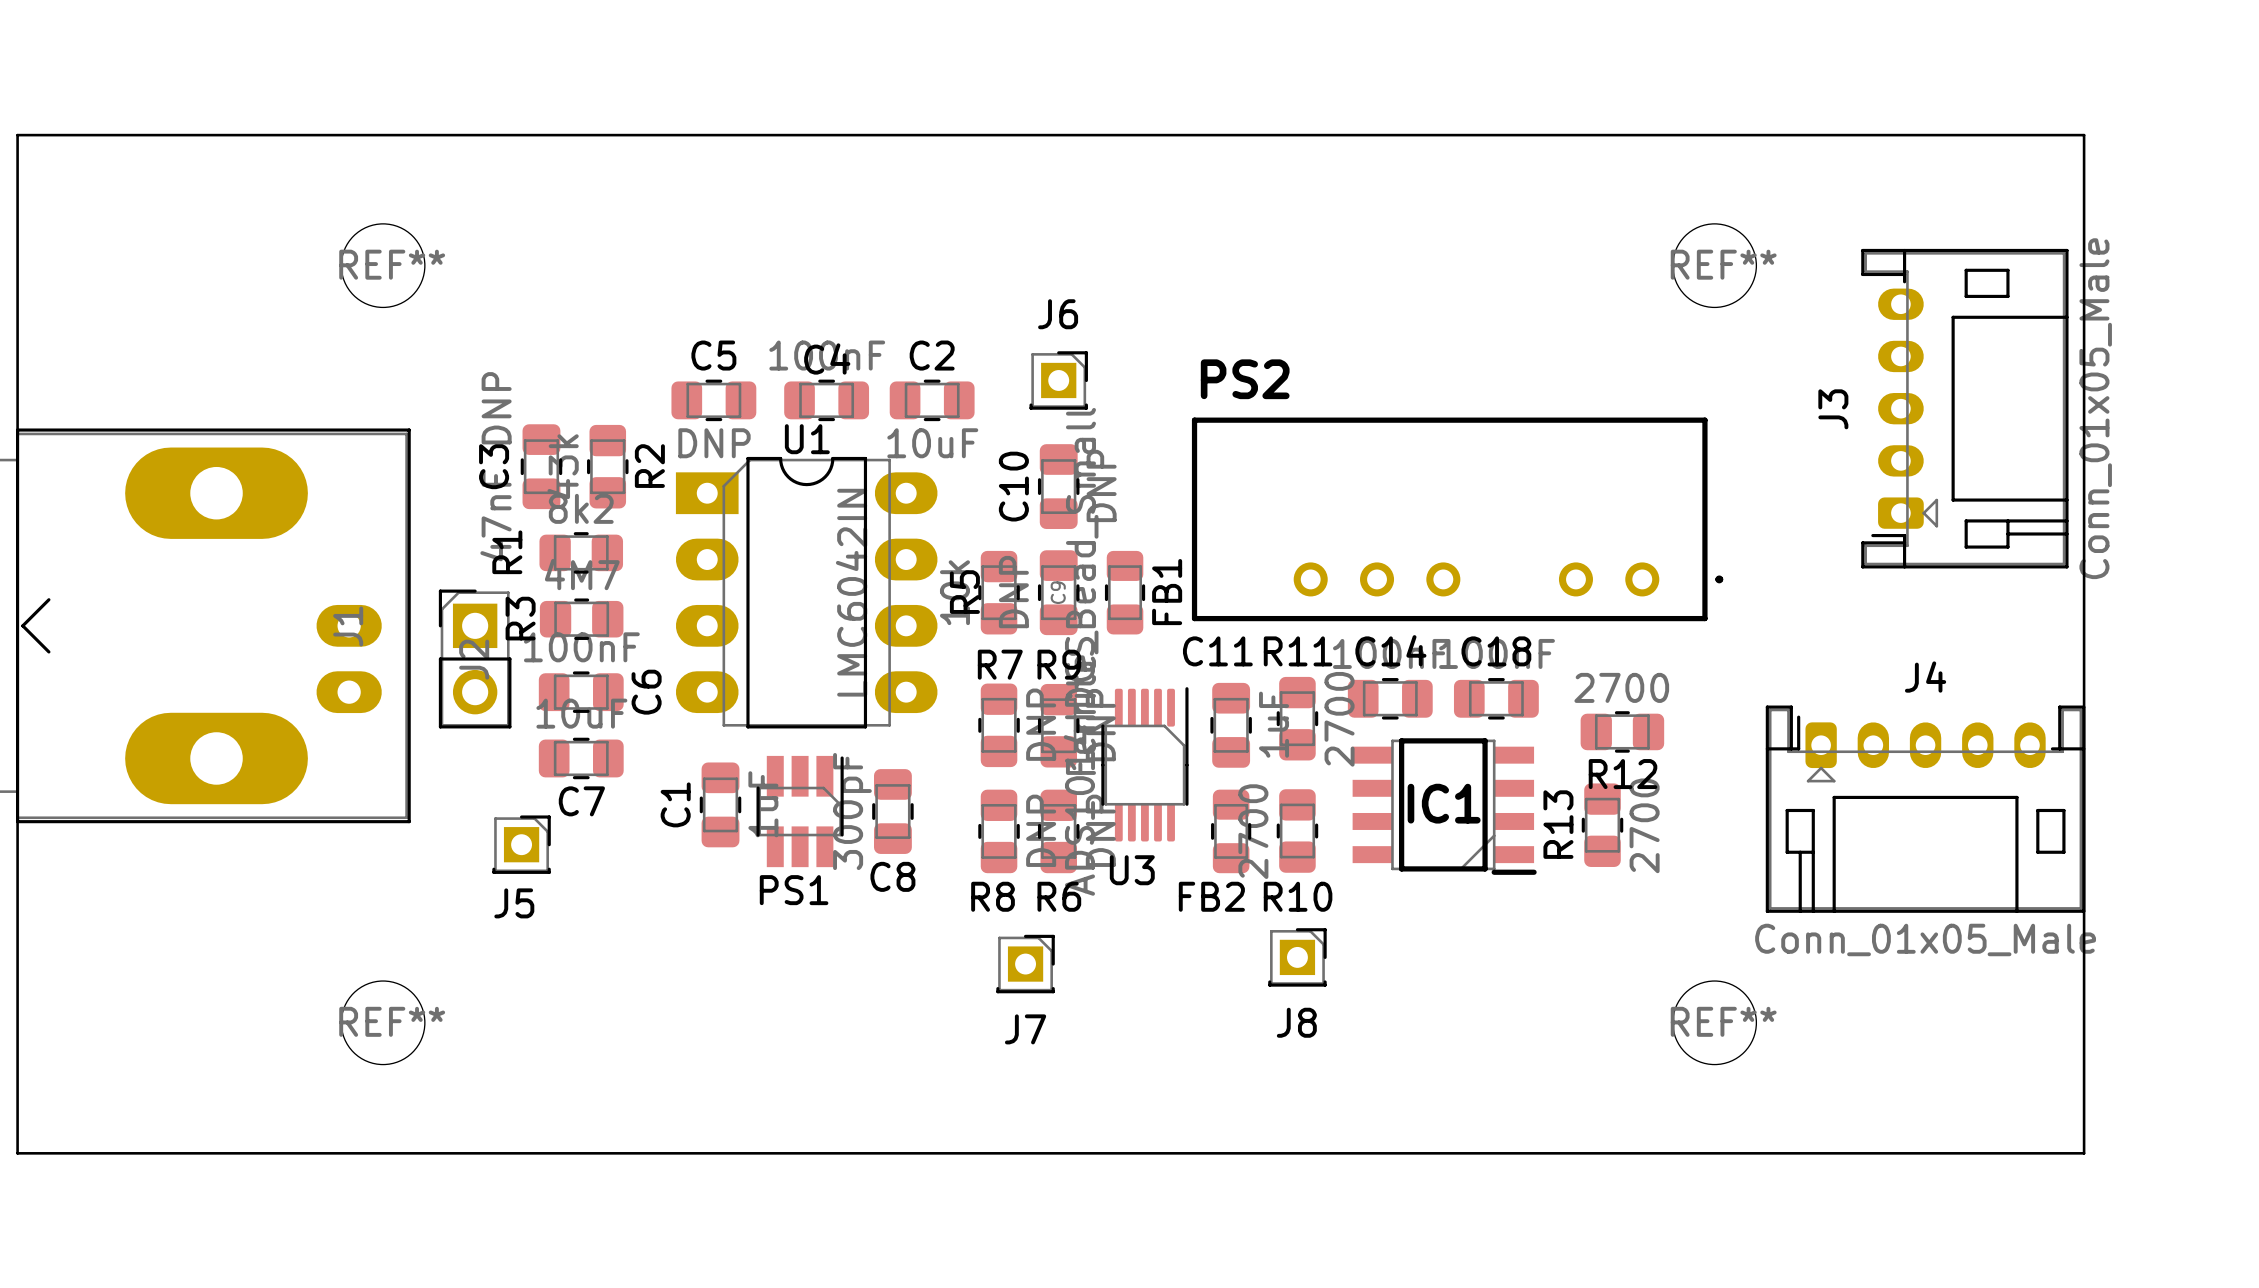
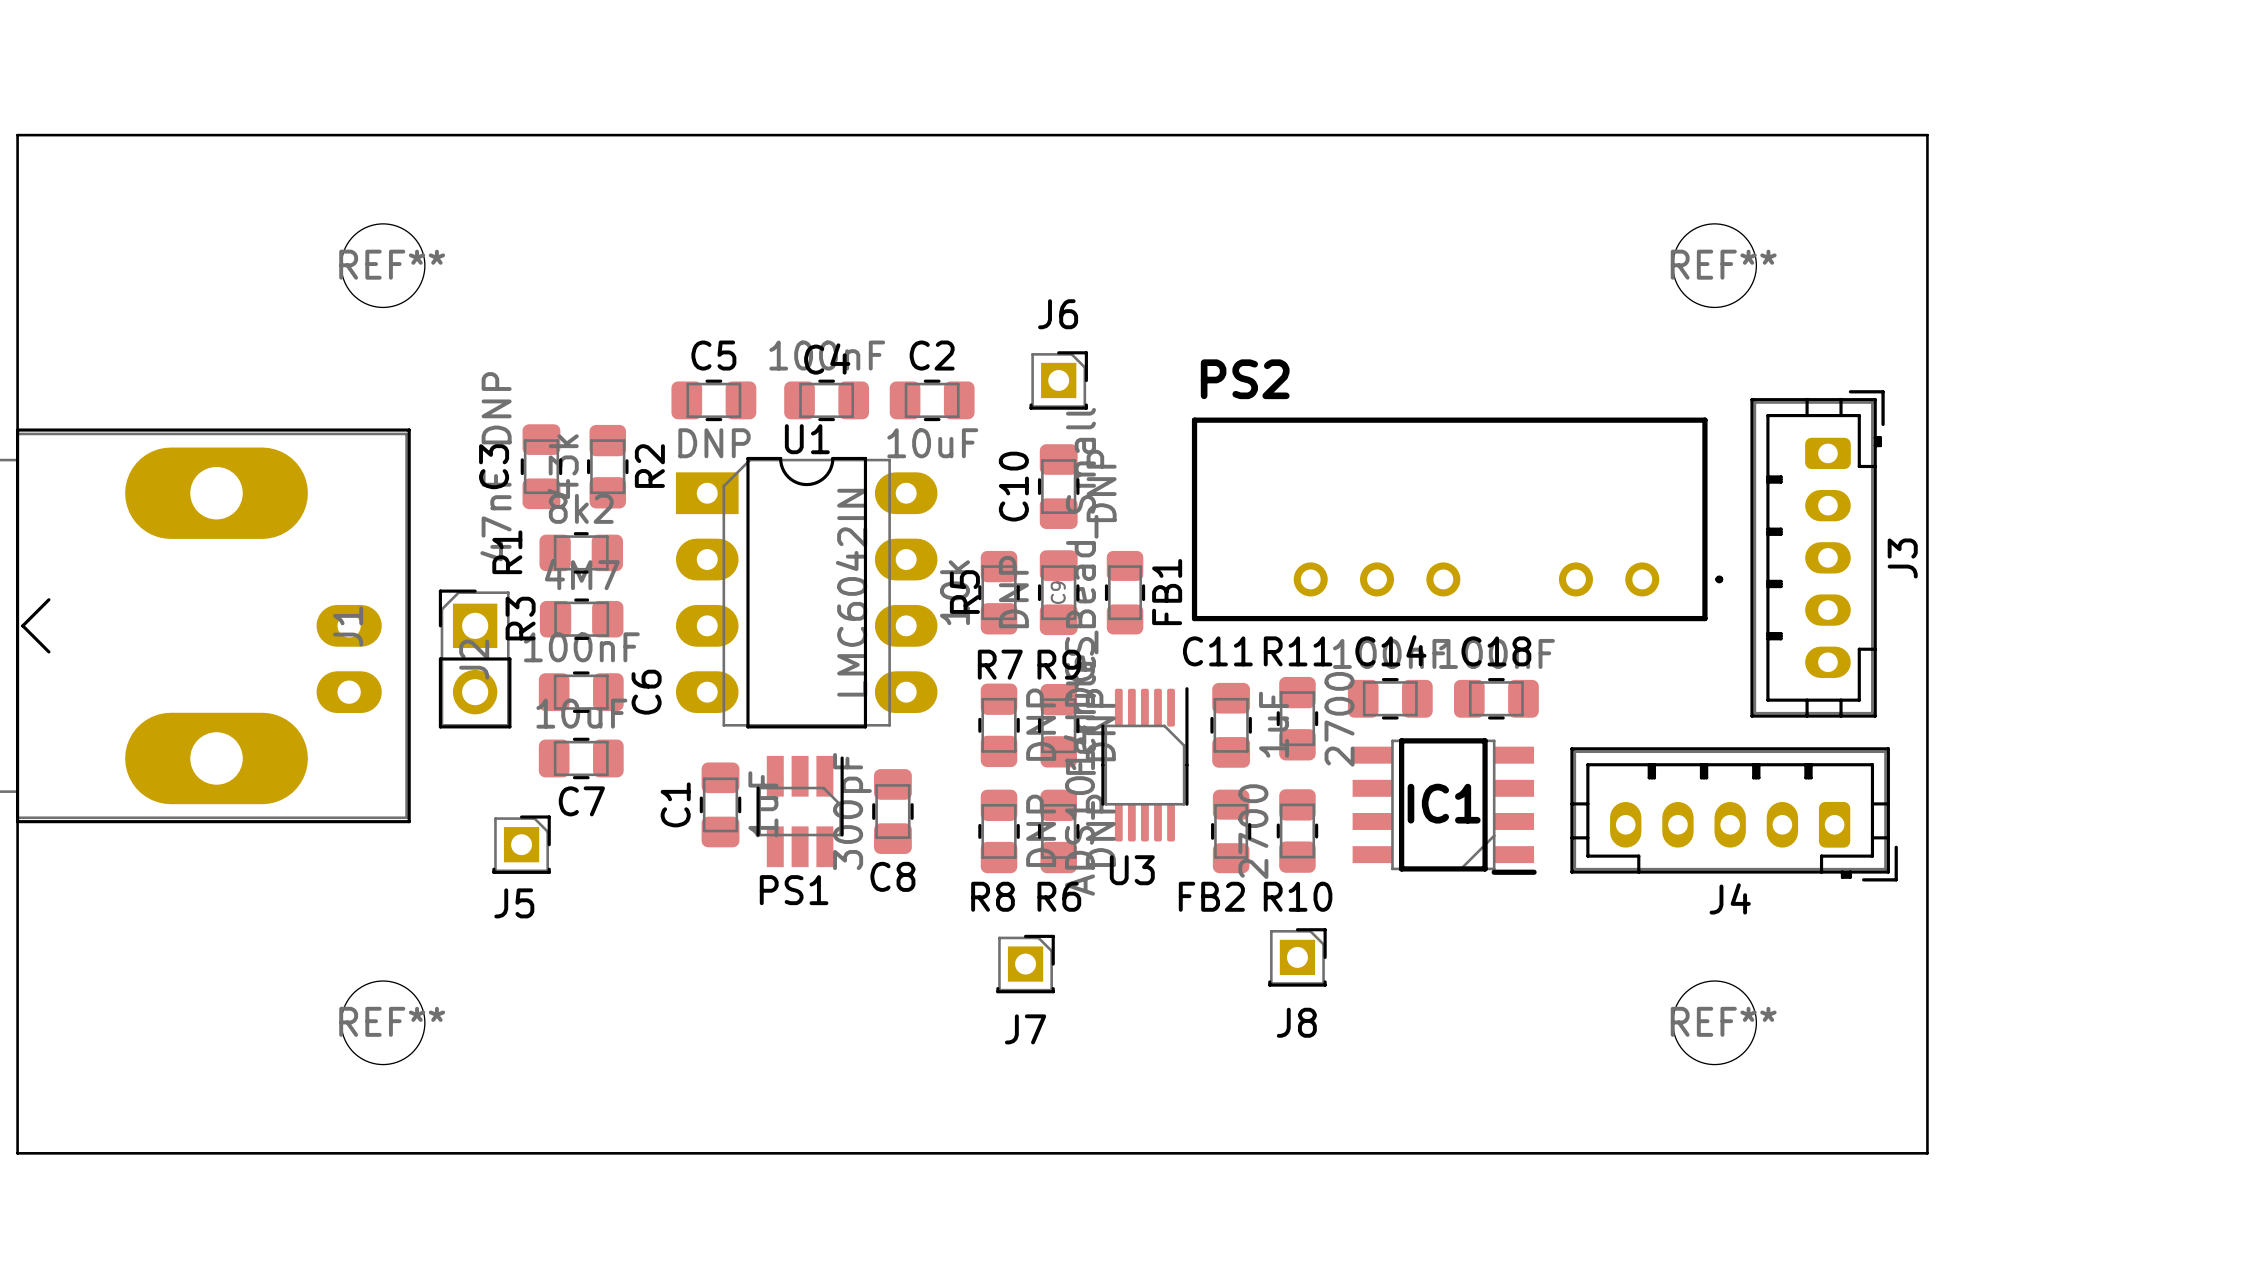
board edge: (1927, 135) (2084, 135) (2084, 1153) (1927, 1153) -> (1927, 135) (1927, 1153)
J3 footprint: [1861, 248, 2069, 569] -> [1750, 390, 1885, 718]
J3 value: Conn_01x05_Male (2095, 408) -> none
J3 name position: J3 (1833, 409) -> J3 (1902, 558)
J4 name position: J4 (1925, 677) -> J4 (1730, 898)
J4 footprint: [1765, 705, 2086, 913] -> [1570, 747, 1898, 882]
R12: 2700 (1622, 731) -> none
R13: 2700 (1602, 825) -> none
J4 value: Conn_01x05_Male (1925, 939) -> none

